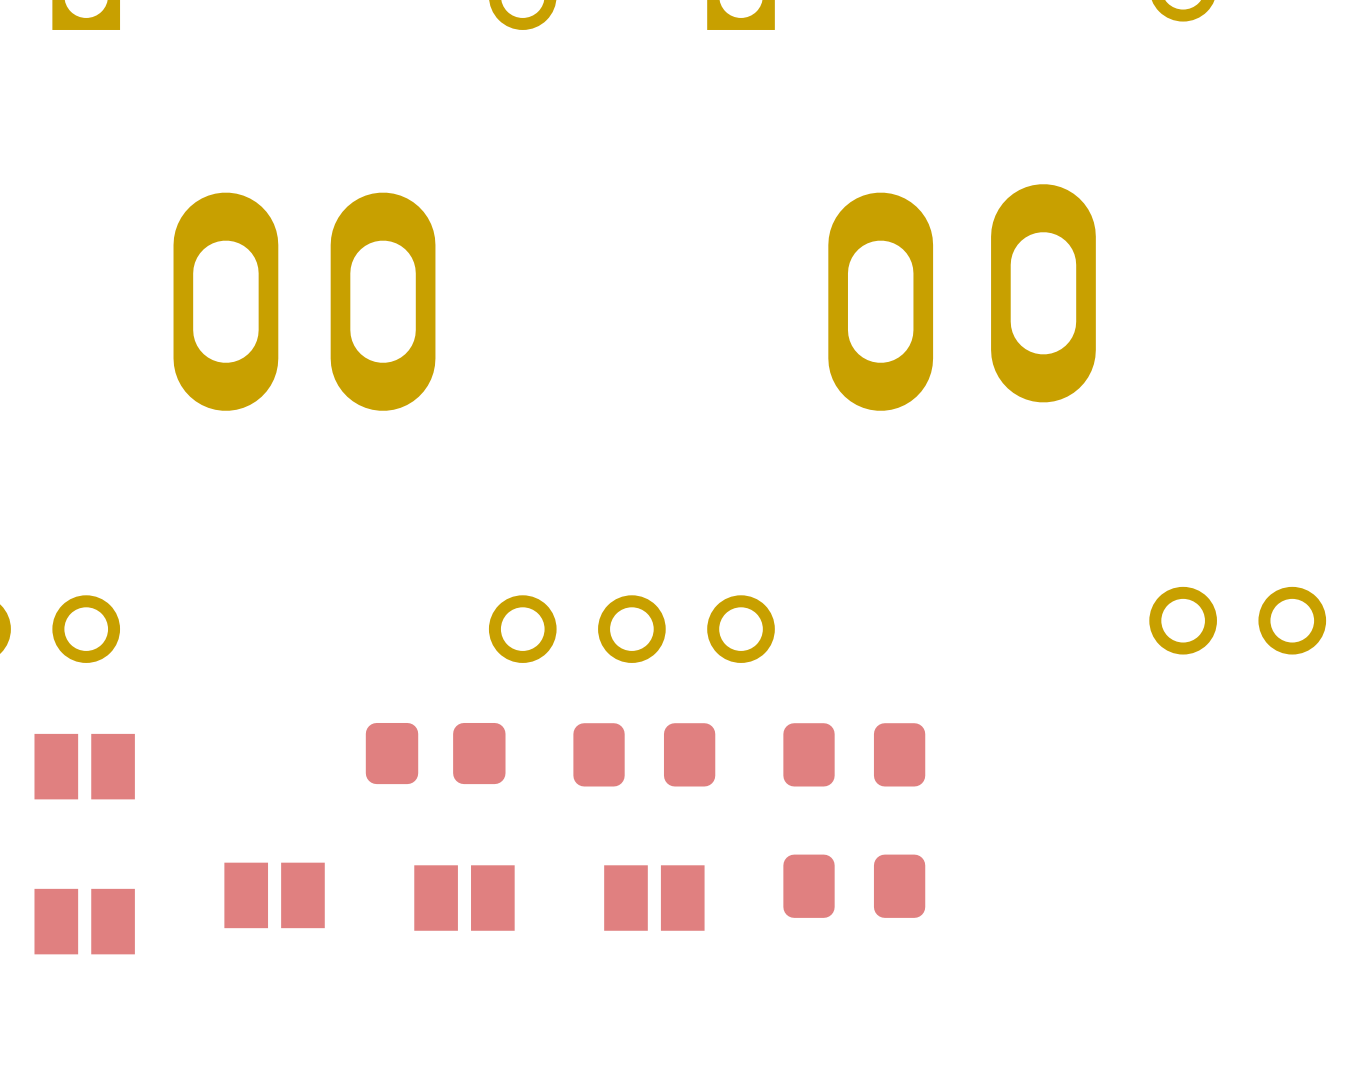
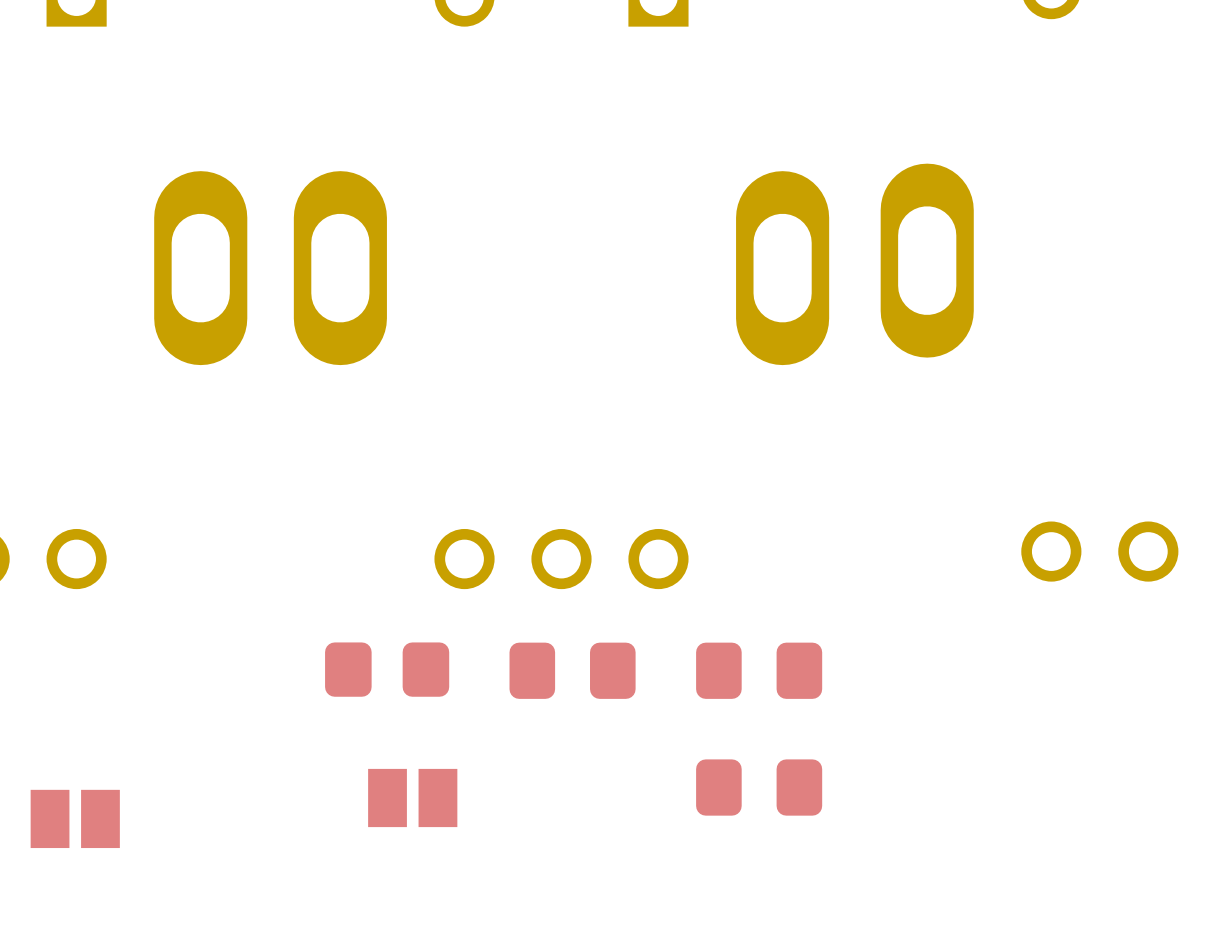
part: (84, 766) -> none
part: (274, 895) -> none
part: (654, 898) -> none

